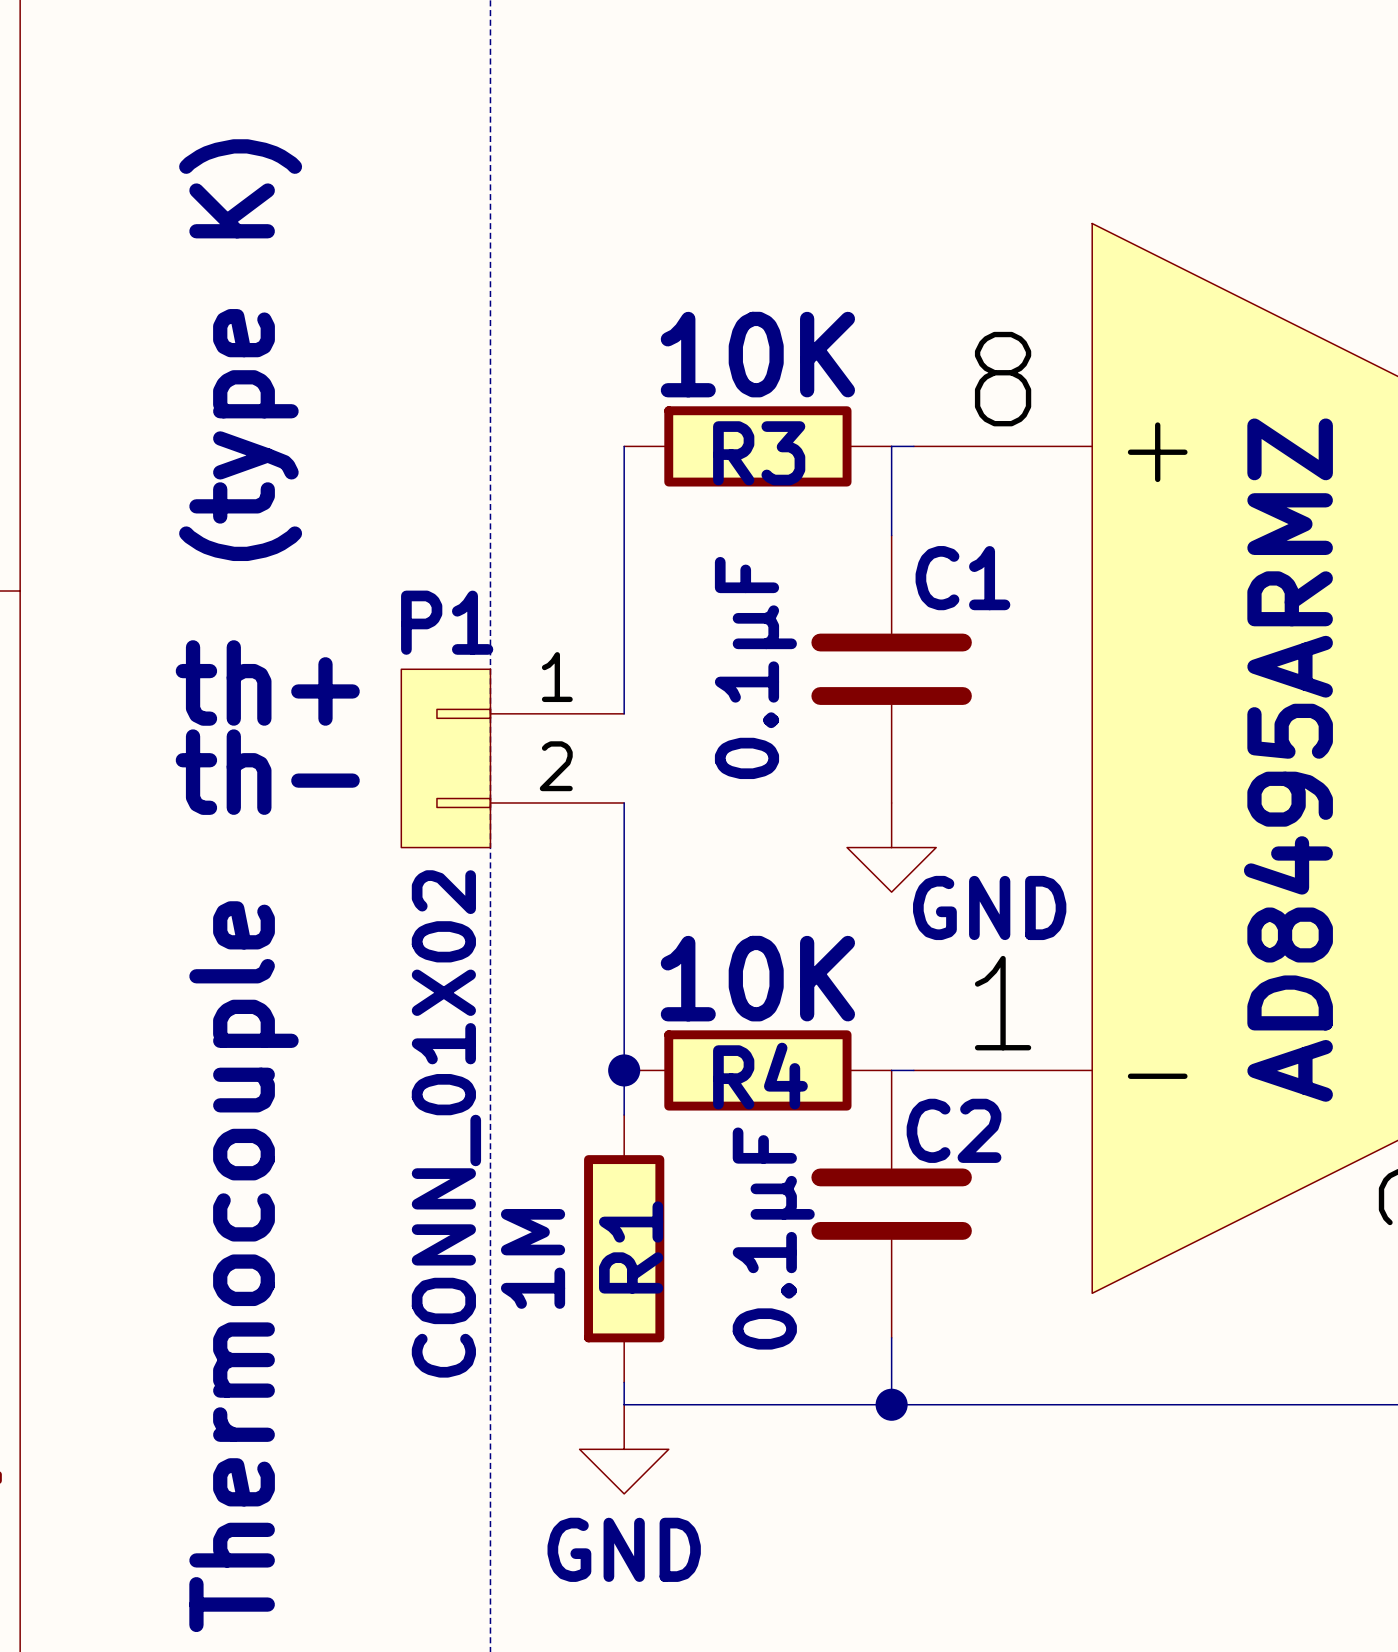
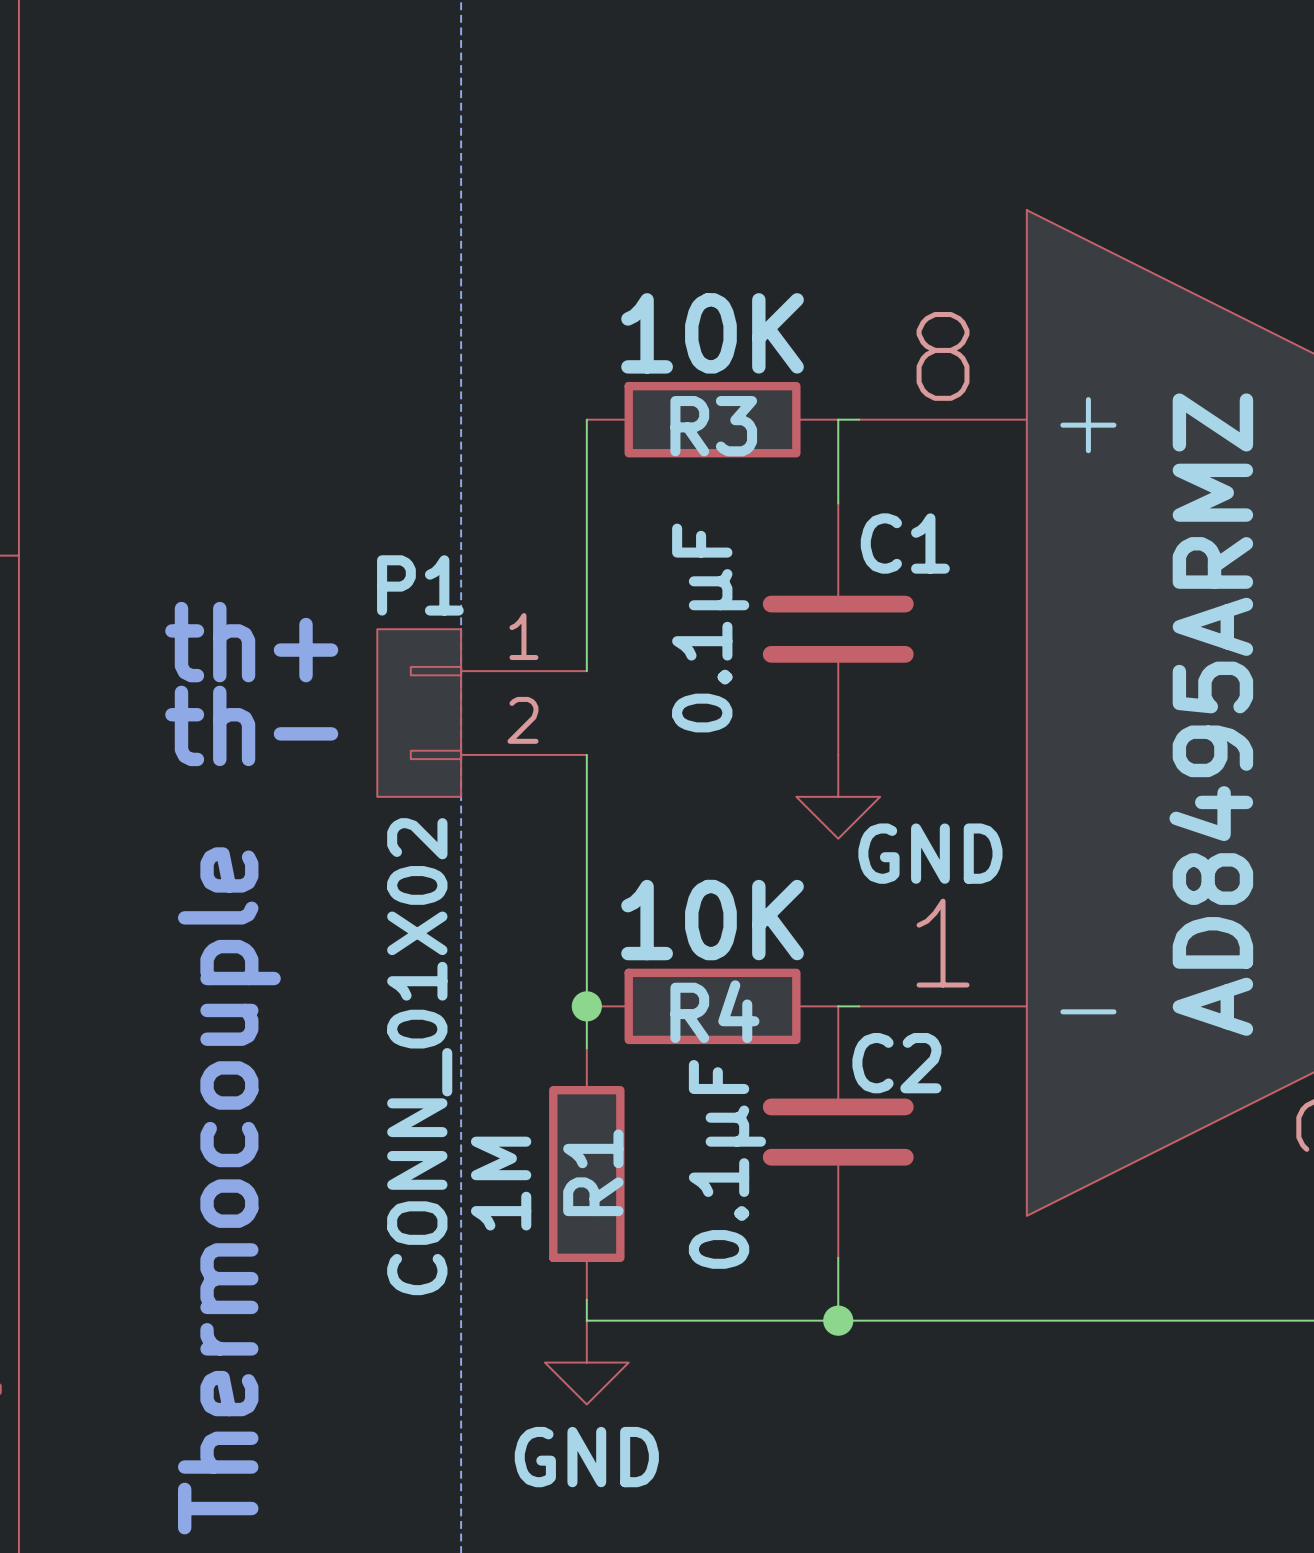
text: (type K) (240, 350) -> none

